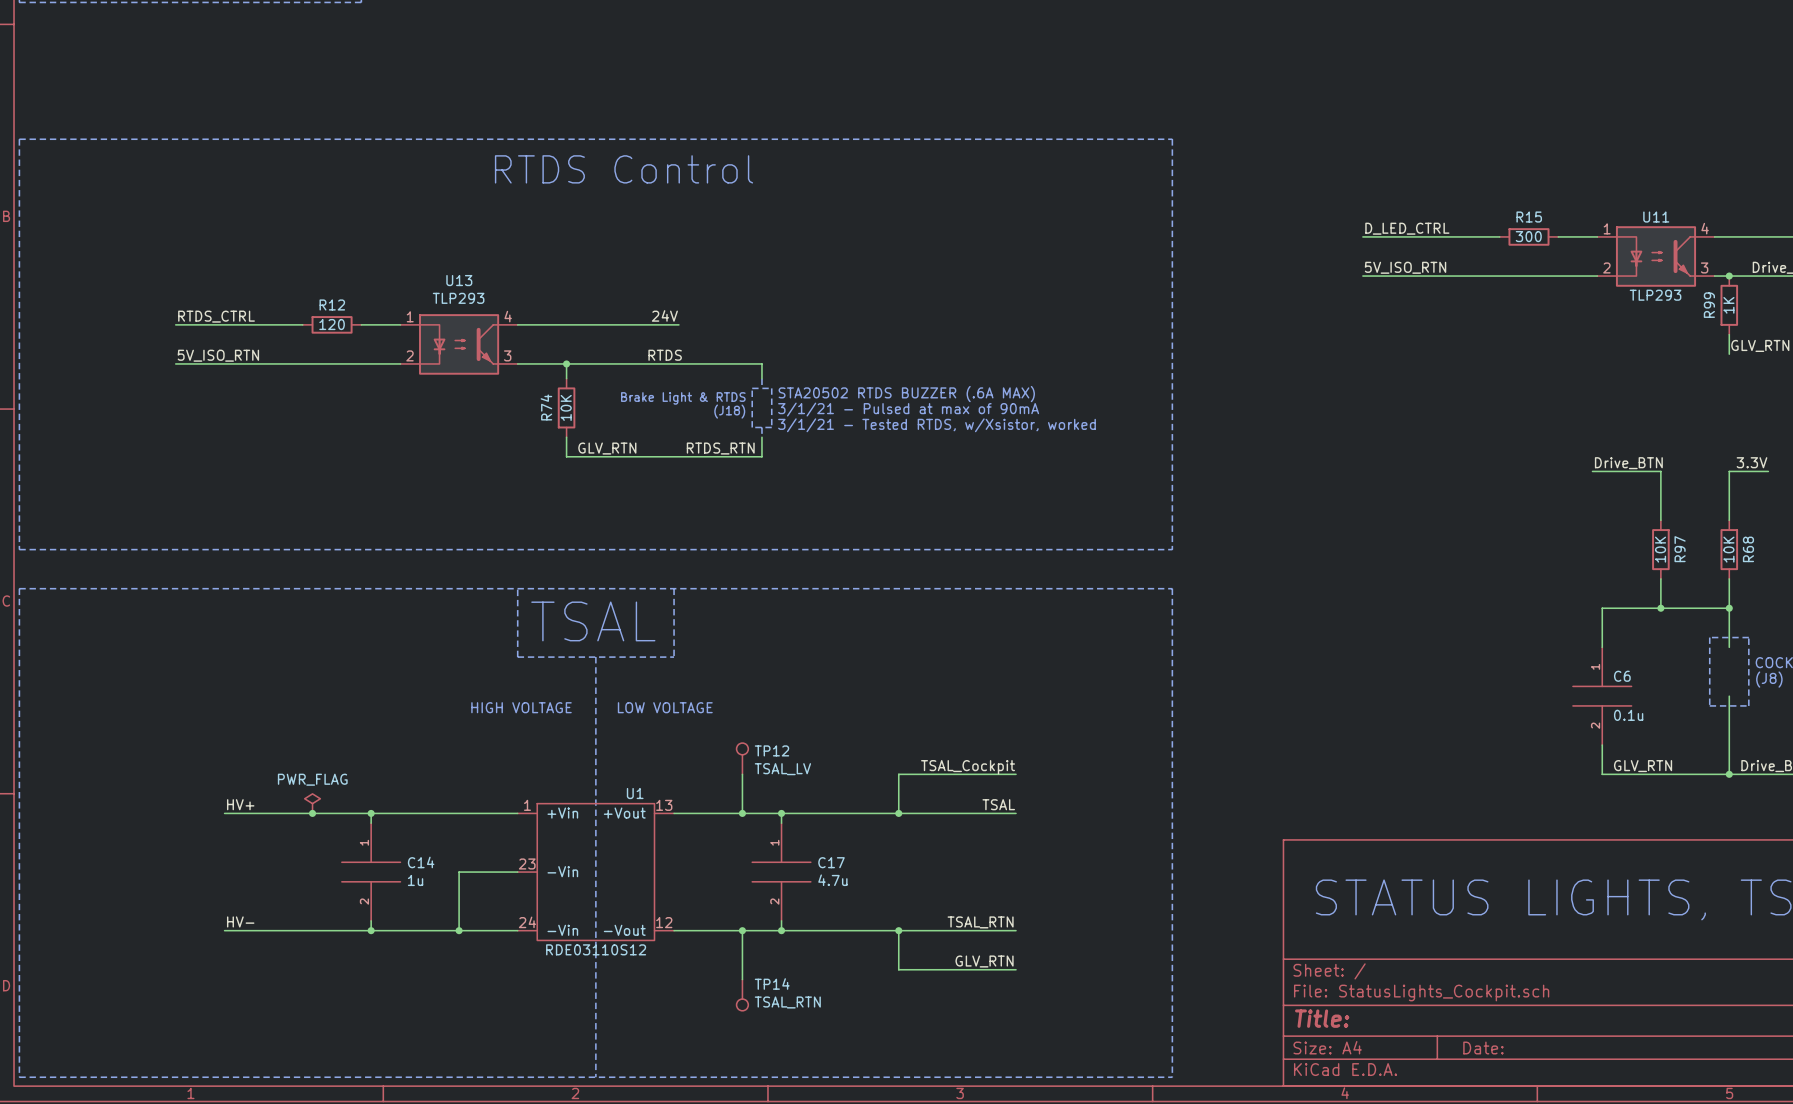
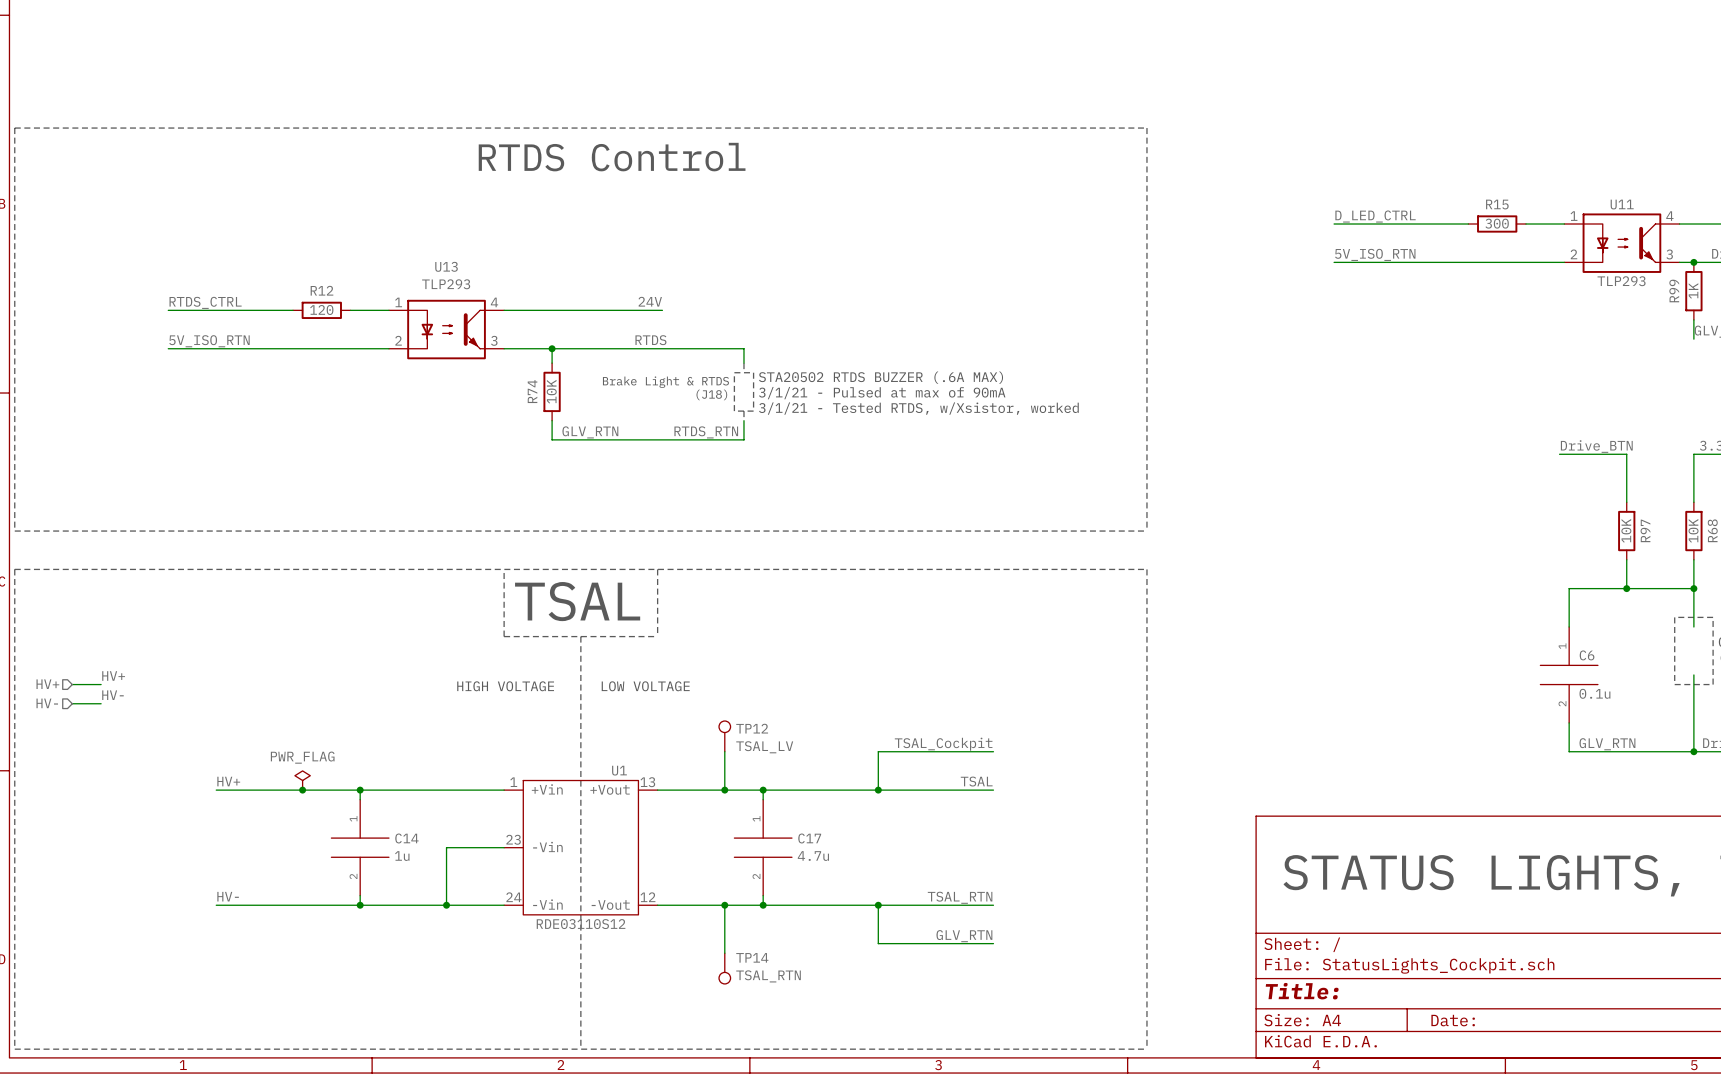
label: none -> HV+ (113, 676)
hierarchical label: none -> HV+ (47, 684)
wire: none -> (72, 684) (101, 684)
label: none -> HV- (112, 695)
hierarchical label: none -> HV- (47, 703)
wire: none -> (72, 703) (101, 703)

